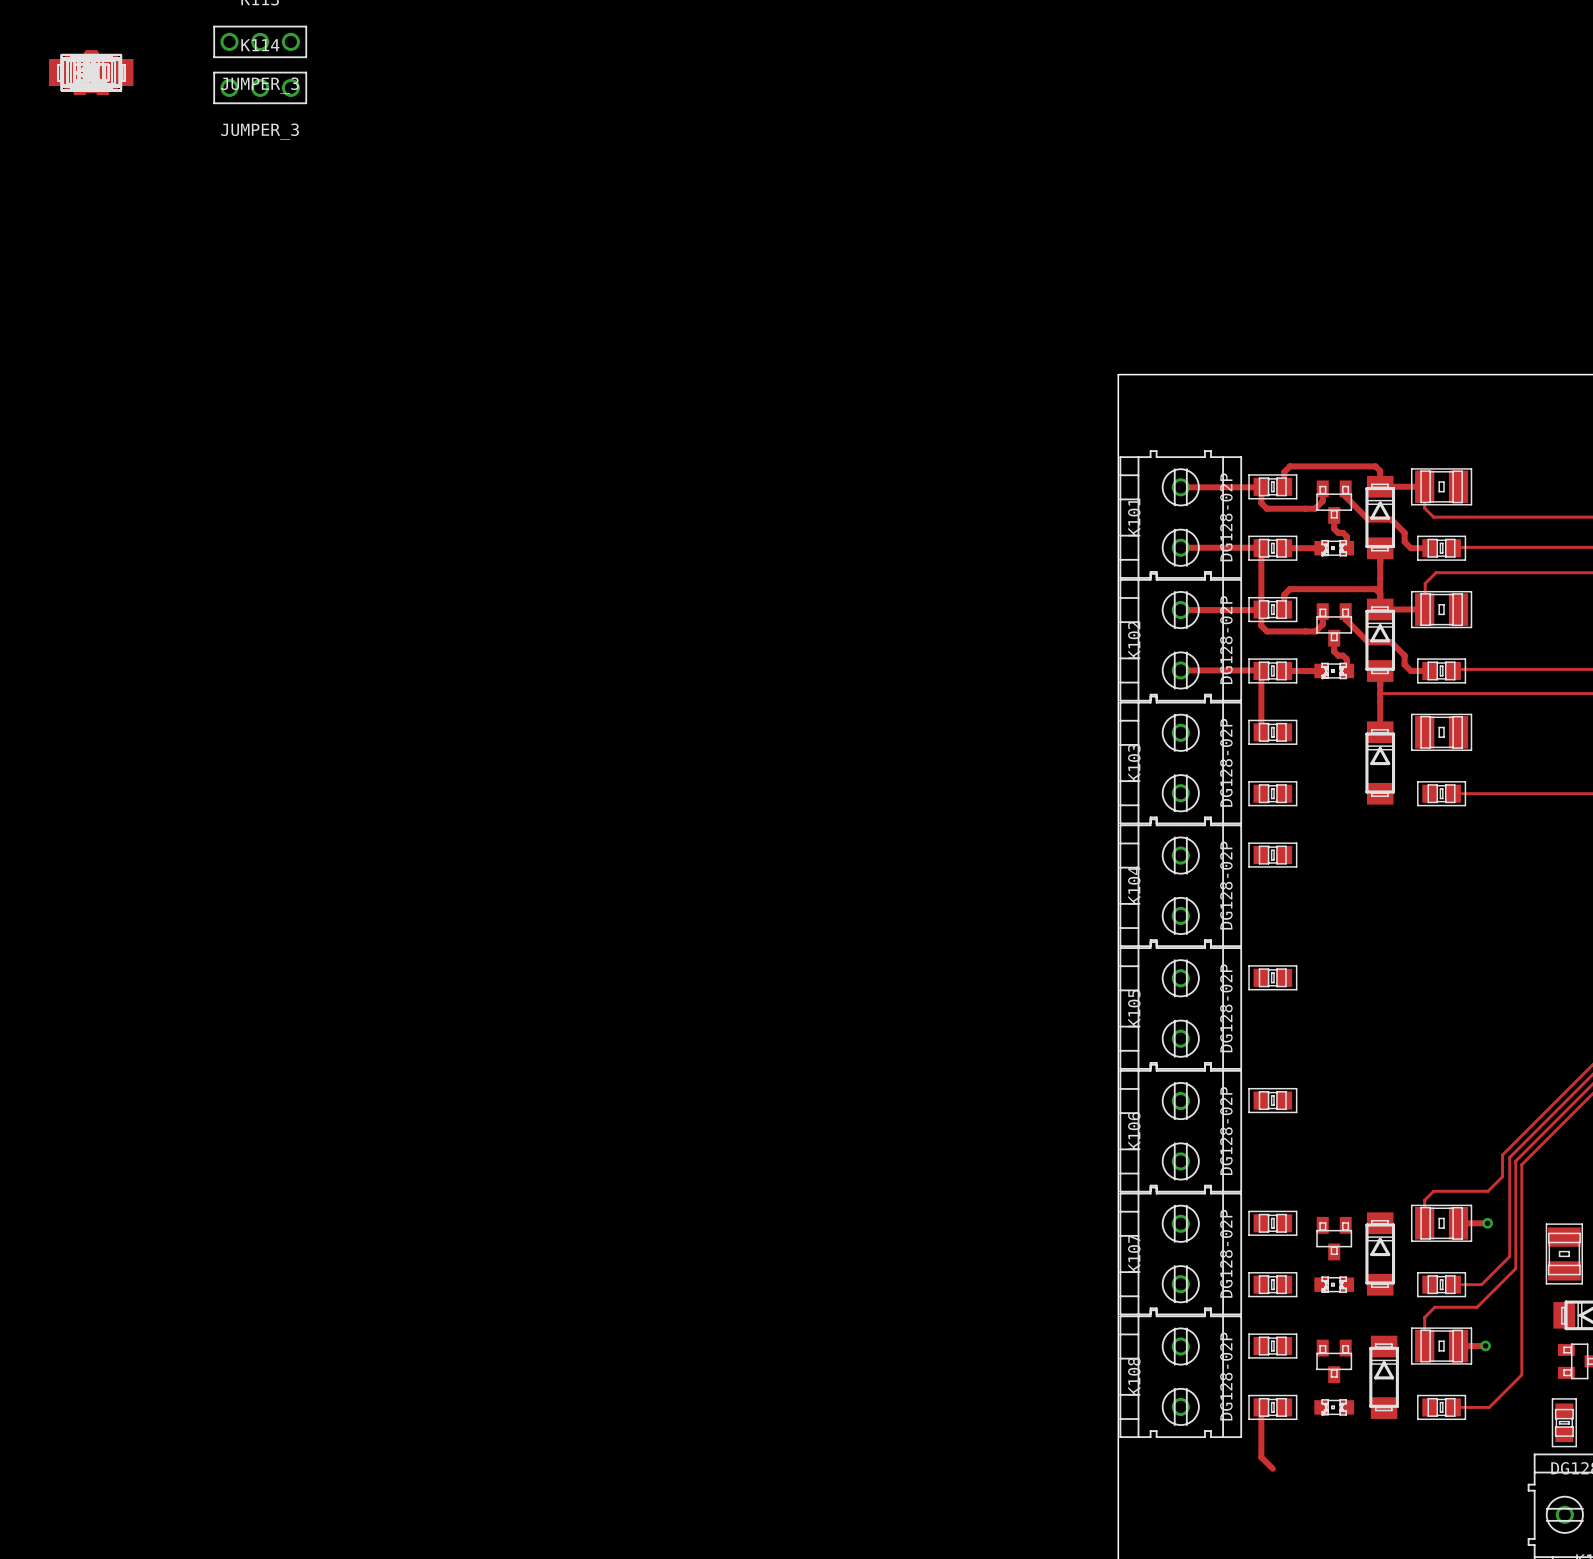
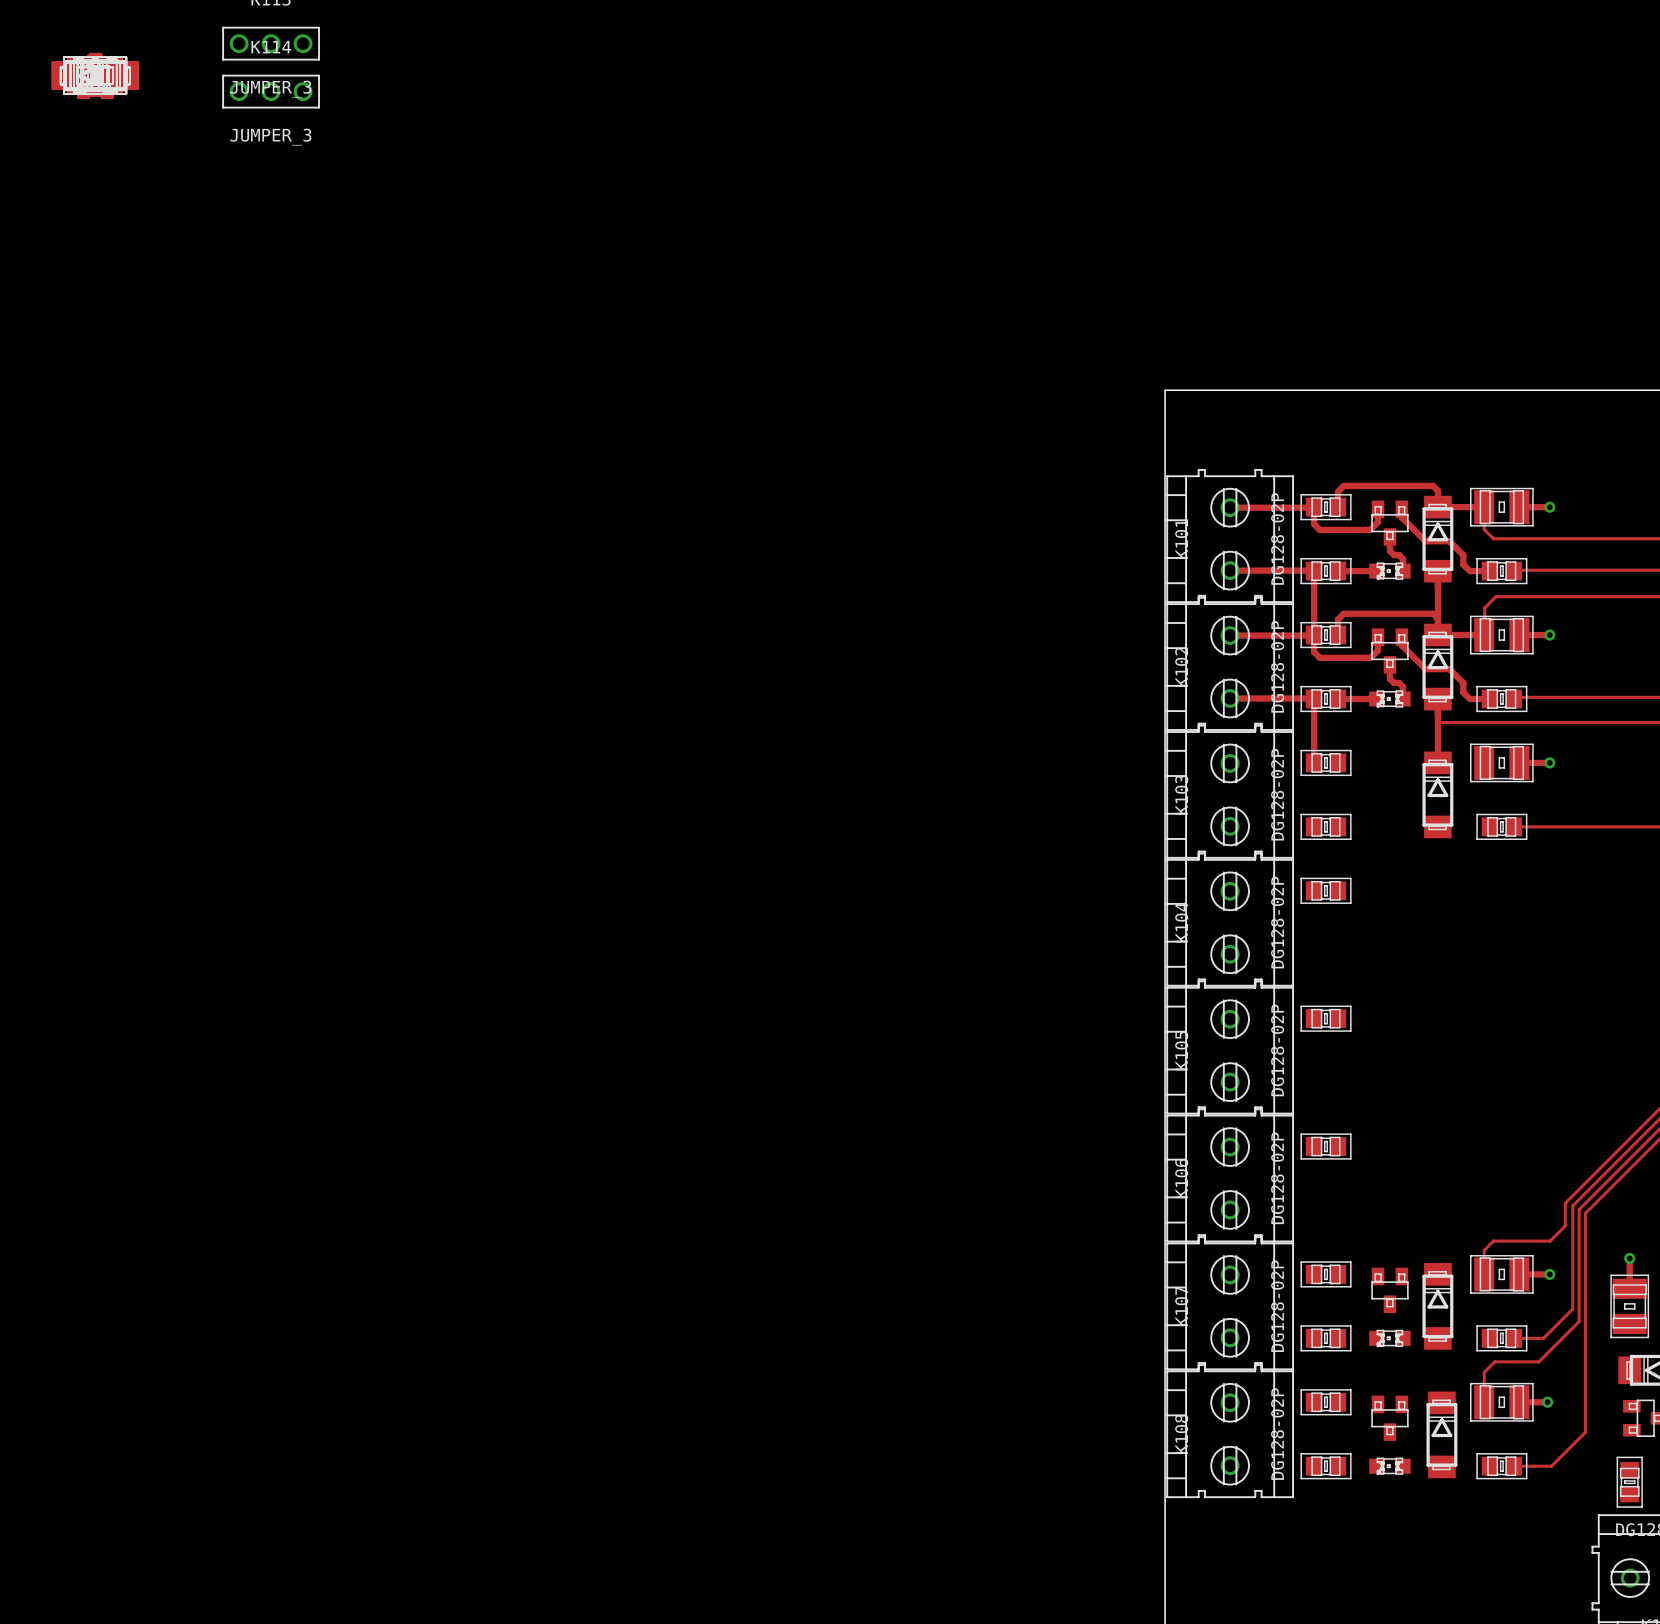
track: none -> (1519, 507) (1549, 507)
via: none -> (1549, 507)
track: none -> (1519, 635) (1549, 635)
via: none -> (1549, 635)
track: none -> (1519, 762) (1549, 762)
via: none -> (1549, 762)
track: none -> (1629, 1258) (1629, 1288)
via: none -> (1629, 1258)
track: (1261, 1407) (1261, 1457) (1272, 1468) -> none

